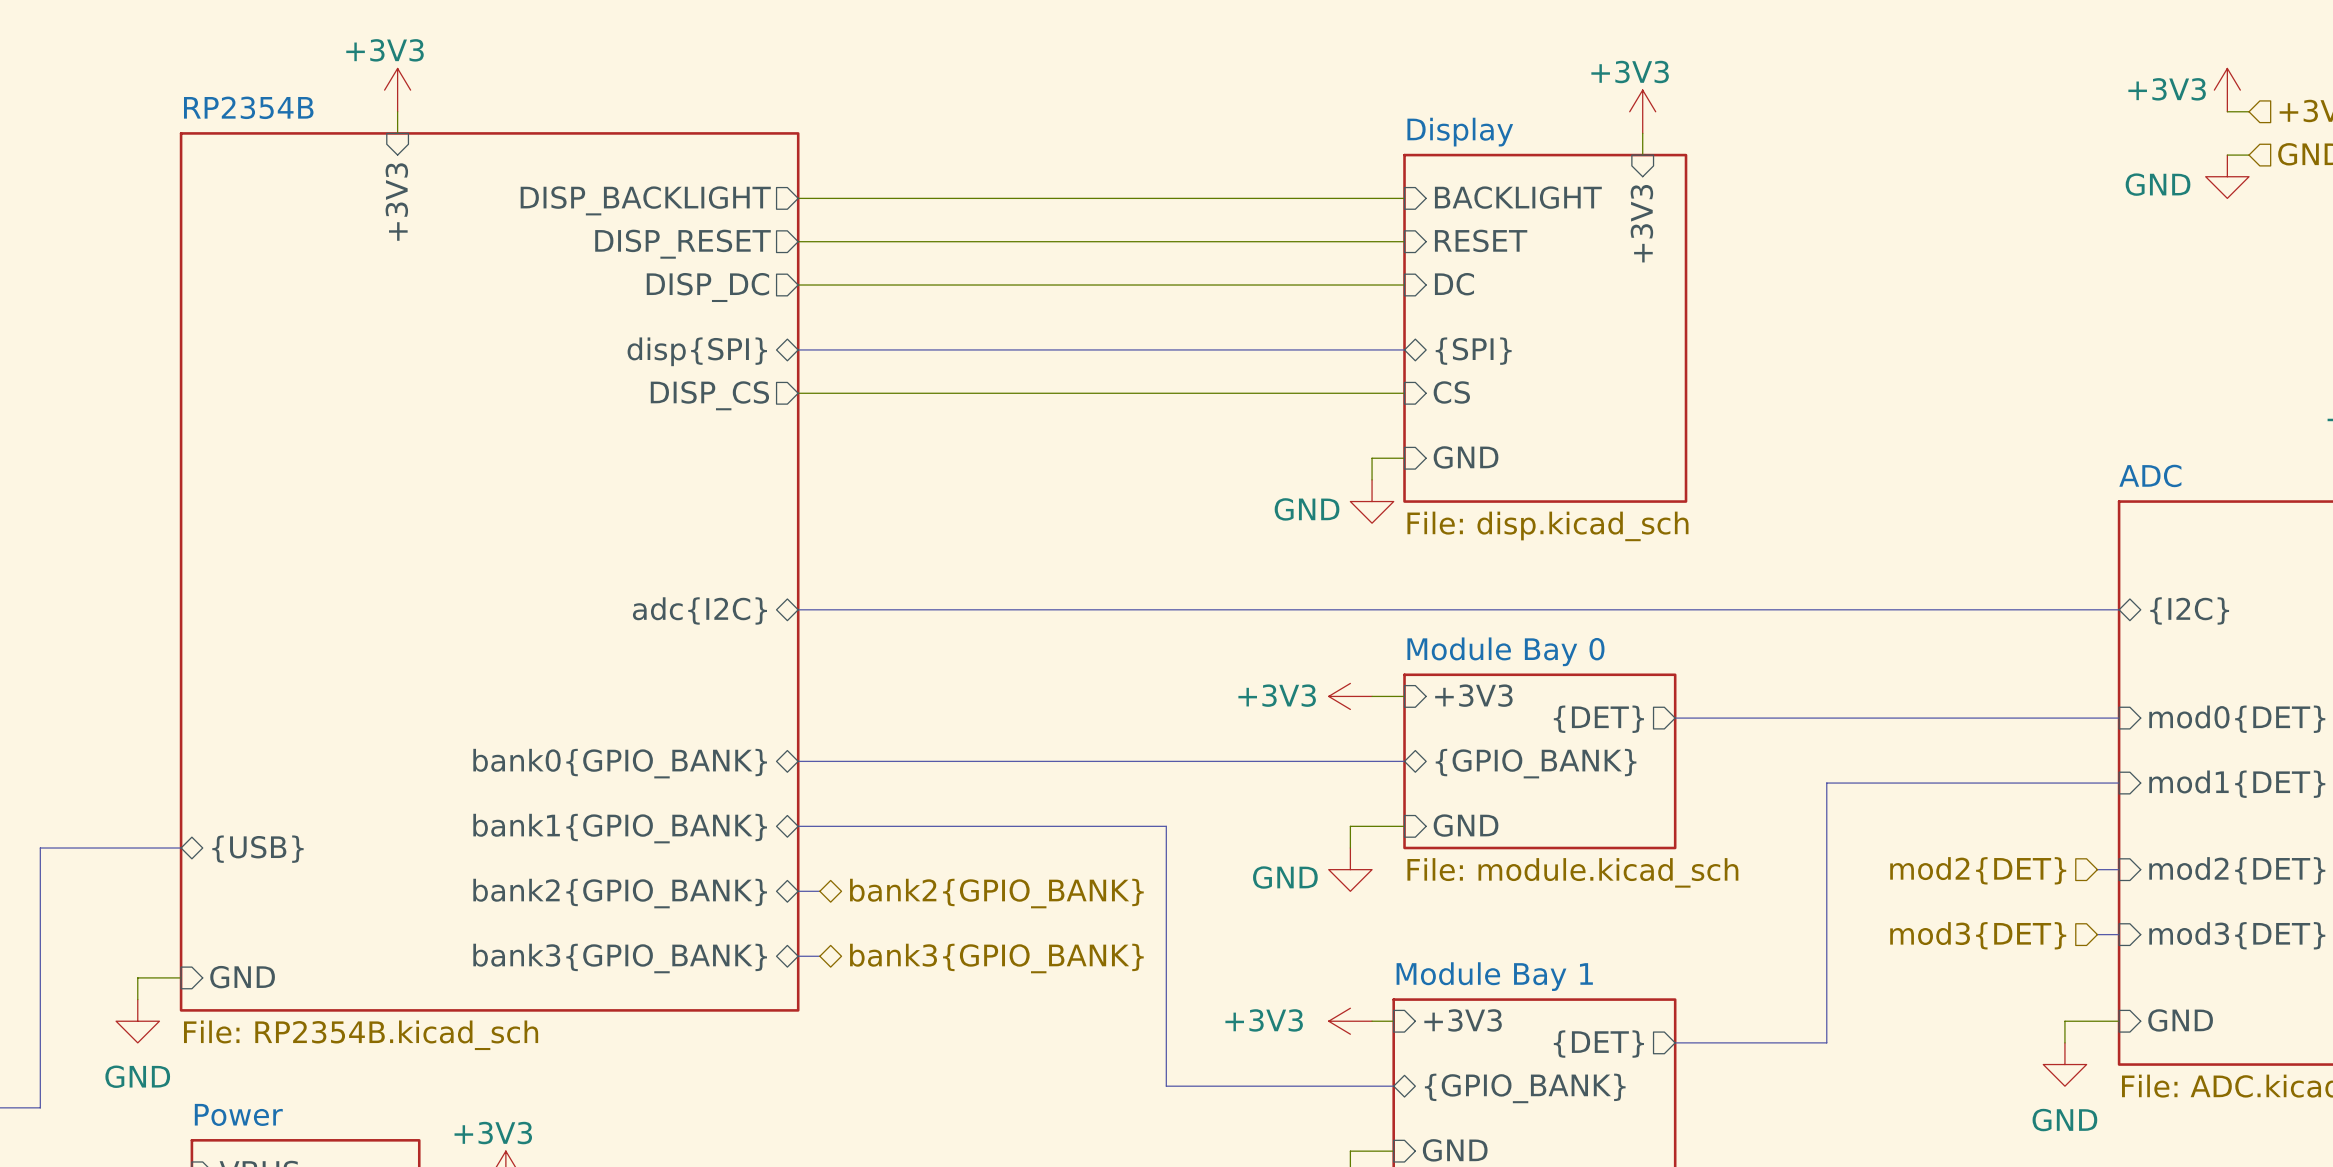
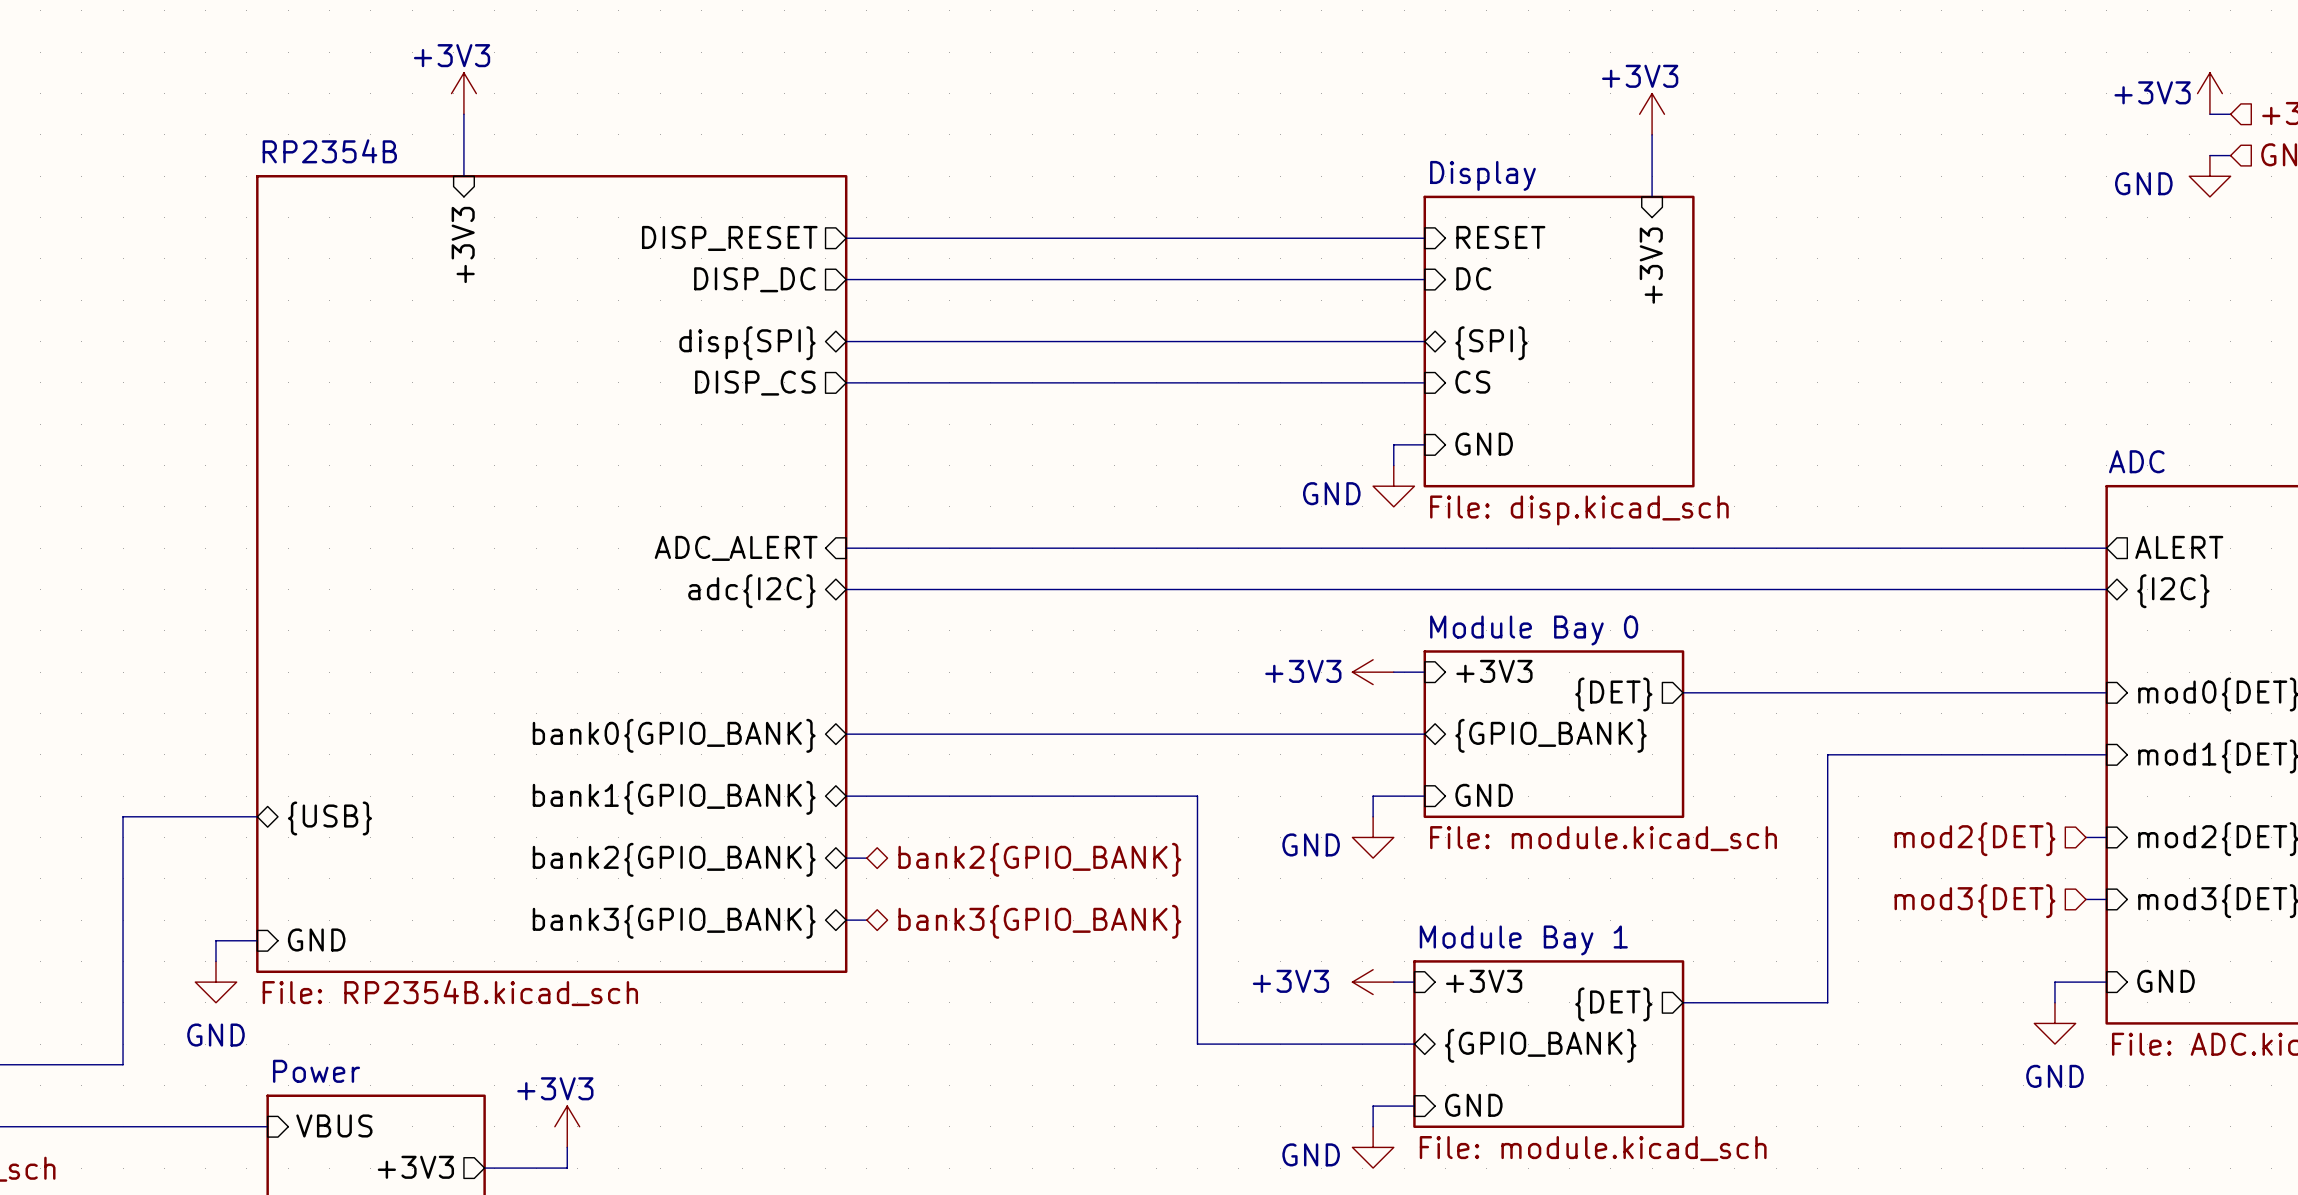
sheet RP2354B shape: [179, 132, 800, 1012] -> [256, 175, 848, 974]
wire: none -> (463, 134) (463, 176)
wire: none -> (1652, 155) (1652, 196)
sheet pin: BACKLIGHT (1518, 197) -> none
wire: (798, 198) (1404, 198) -> none
sheet pin: DISP_BACKLIGHT (645, 200) -> none
sheet pin position: +3V3 (396, 202) -> +3V3 (463, 244)
sheet pin position: +3V3 (1641, 223) -> +3V3 (1651, 265)
sheet Display: File: disp.kicad_sch (1545, 328) -> none
sheet Display: none -> File: disp.kicad_sch (1559, 341)
sheet pin: none -> ALERT (2179, 547)
wire: none -> (846, 548) (2106, 548)
sheet pin: none -> ADC_ALERT (736, 548)

